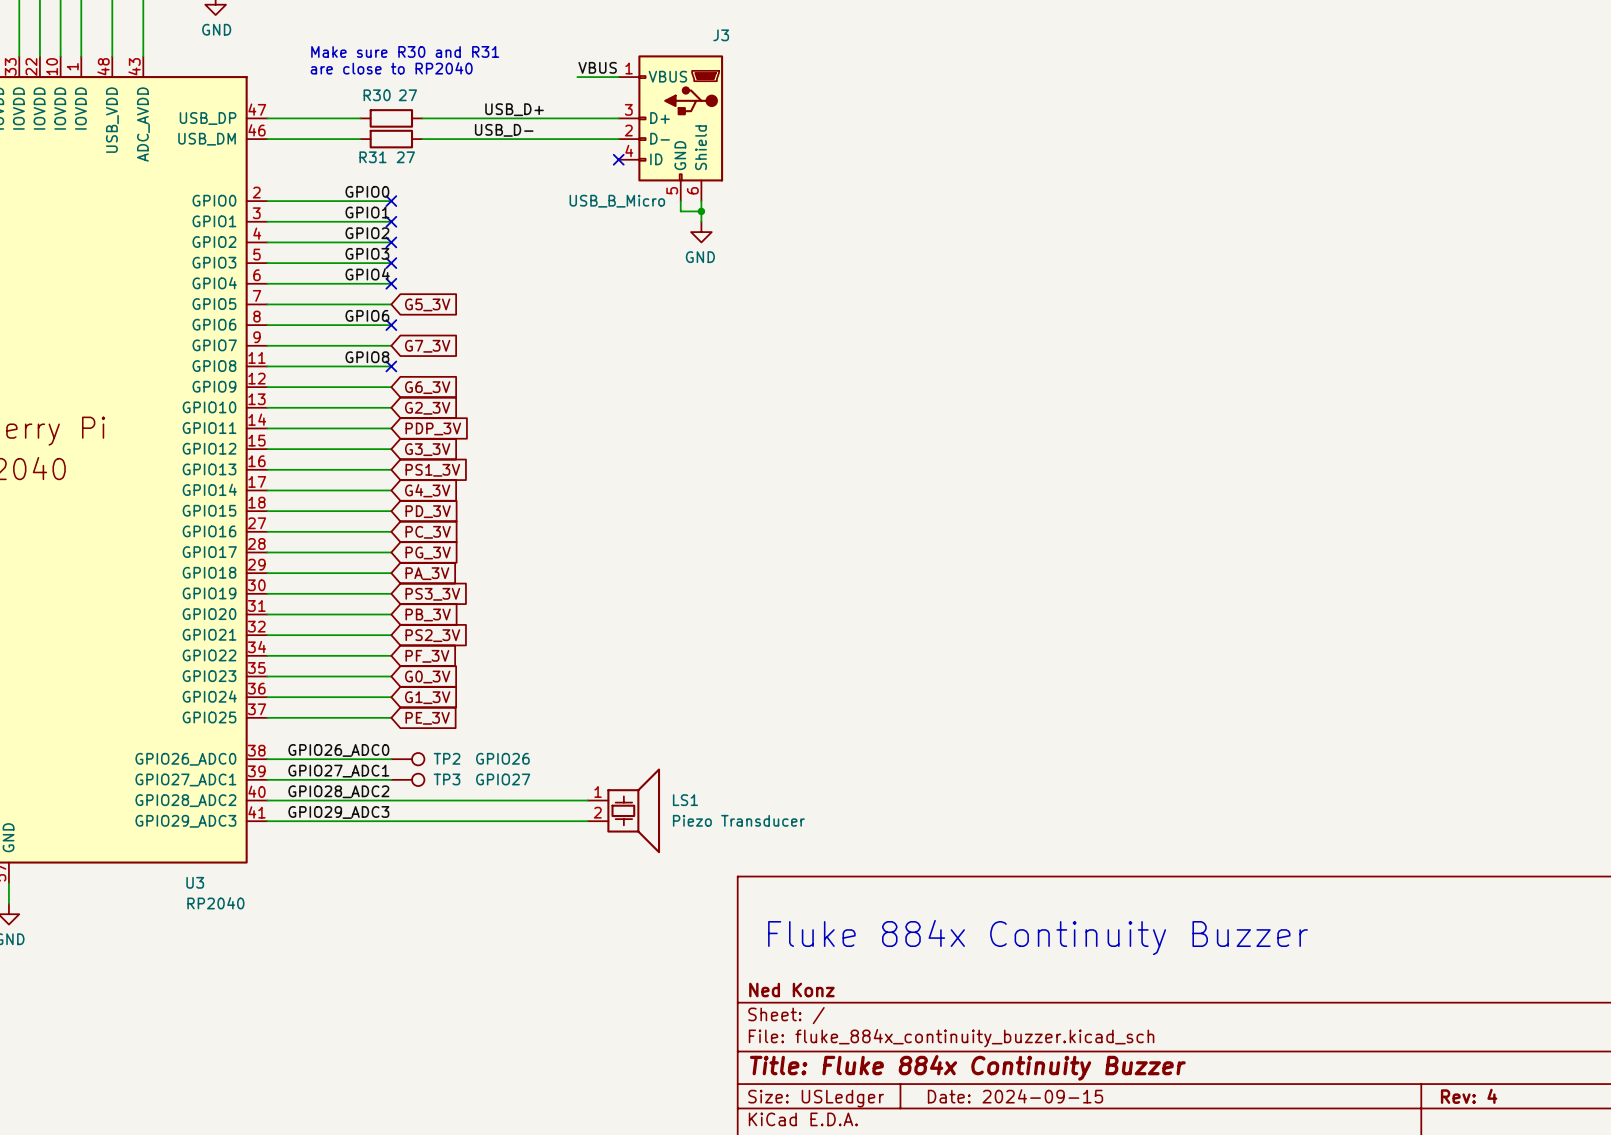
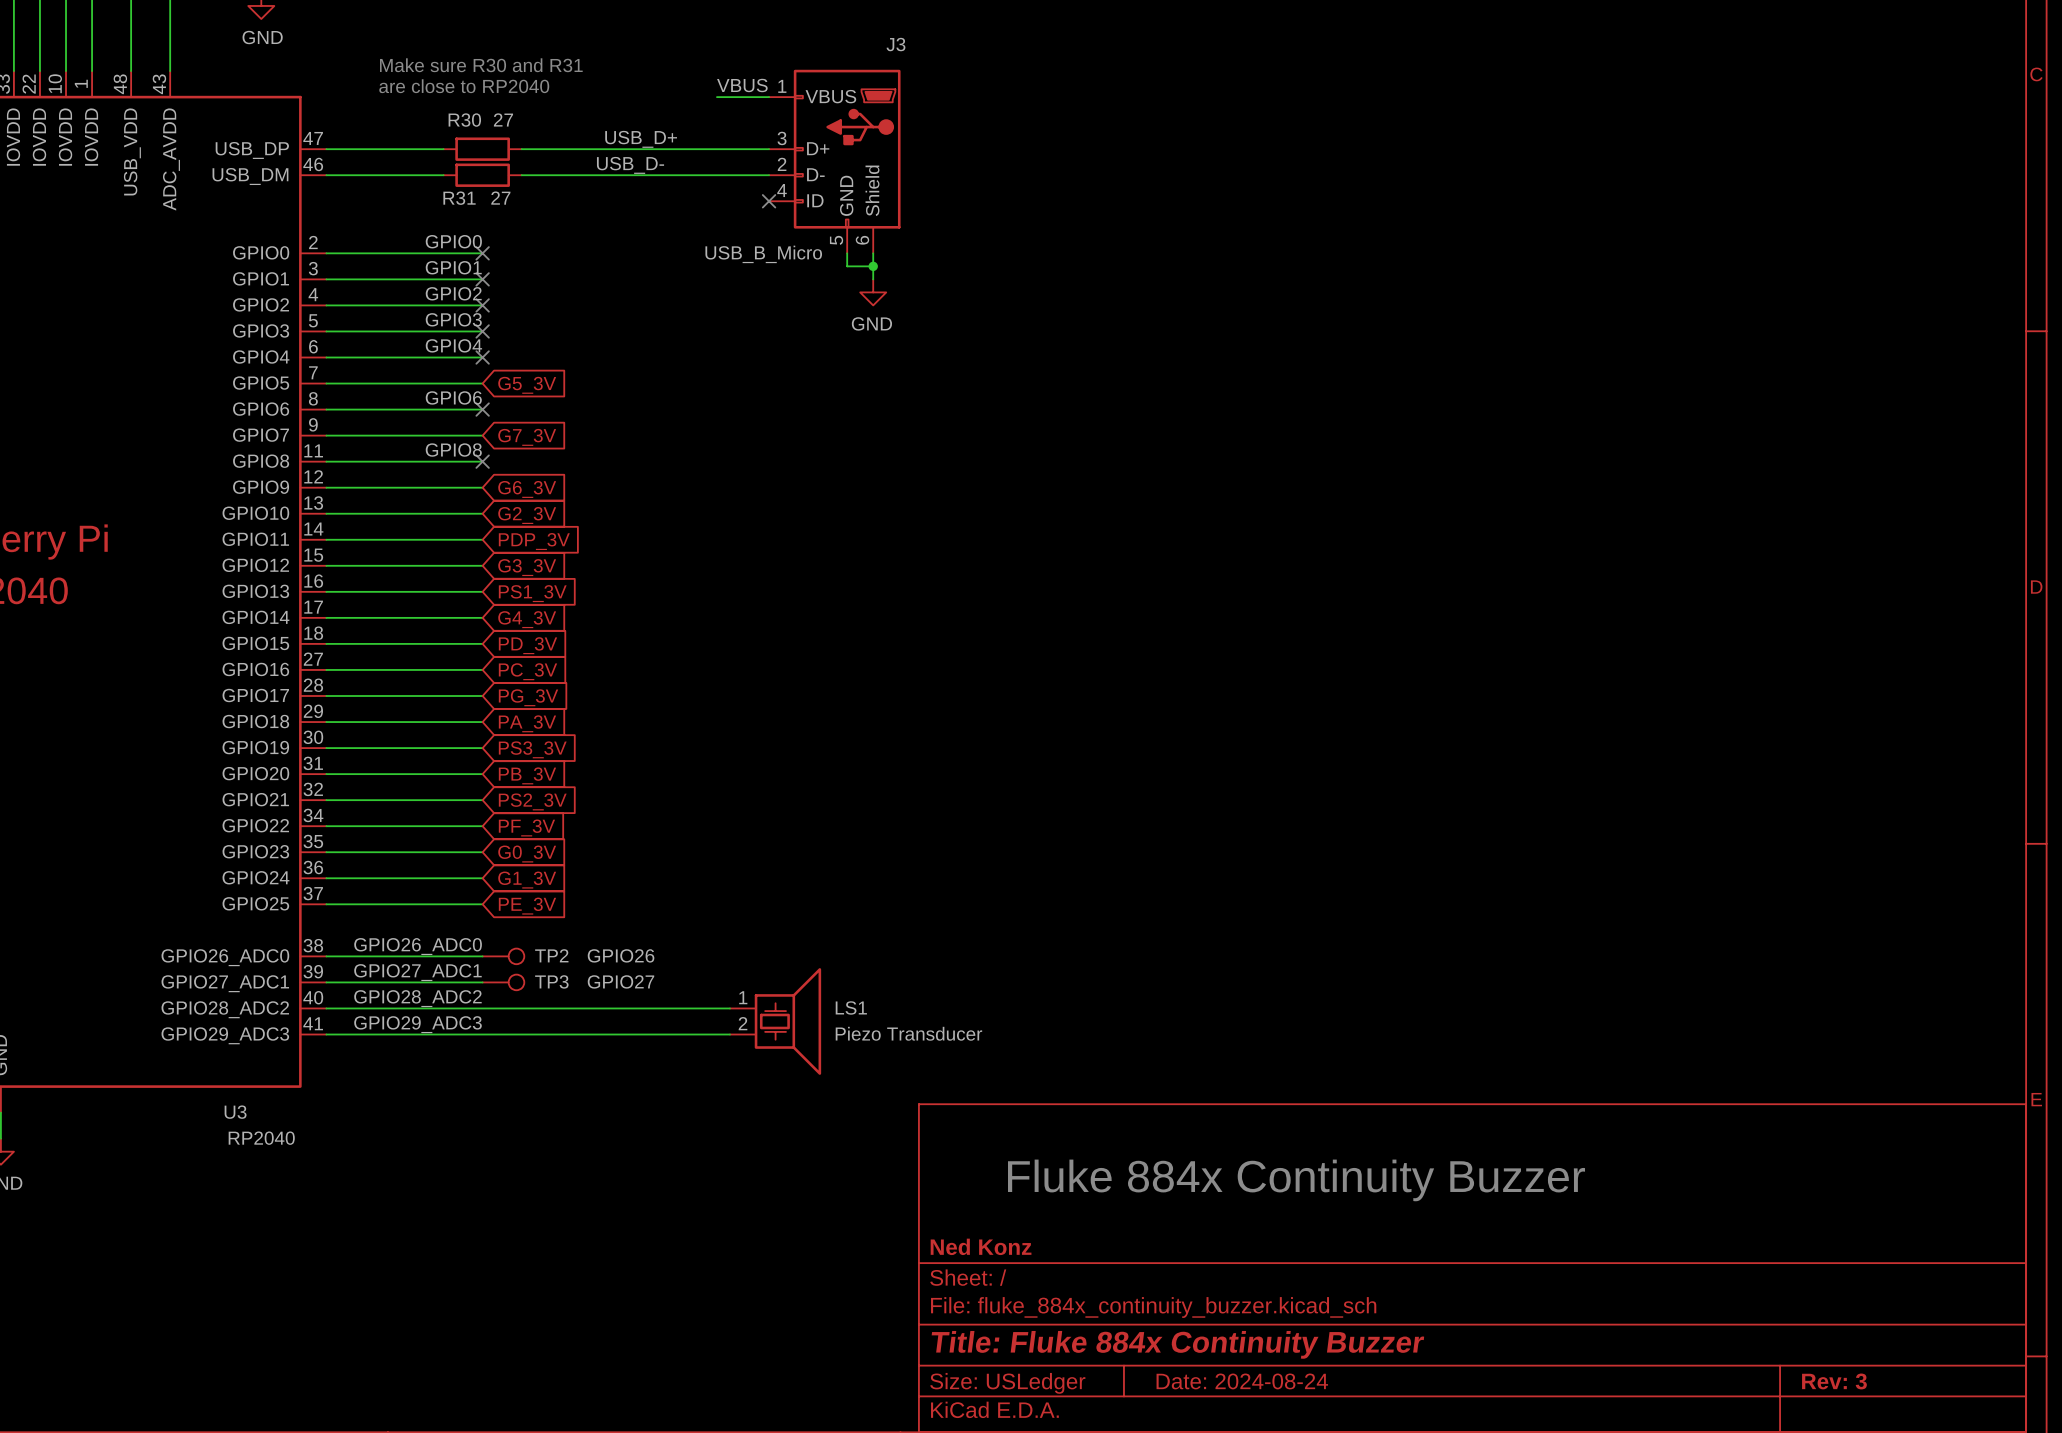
title block: Date: 2024-09-15 (1015, 1096) -> Date: 2024-08-24 (1242, 1381)
title block: Rev: 4 (1469, 1096) -> Rev: 3 (1834, 1381)

